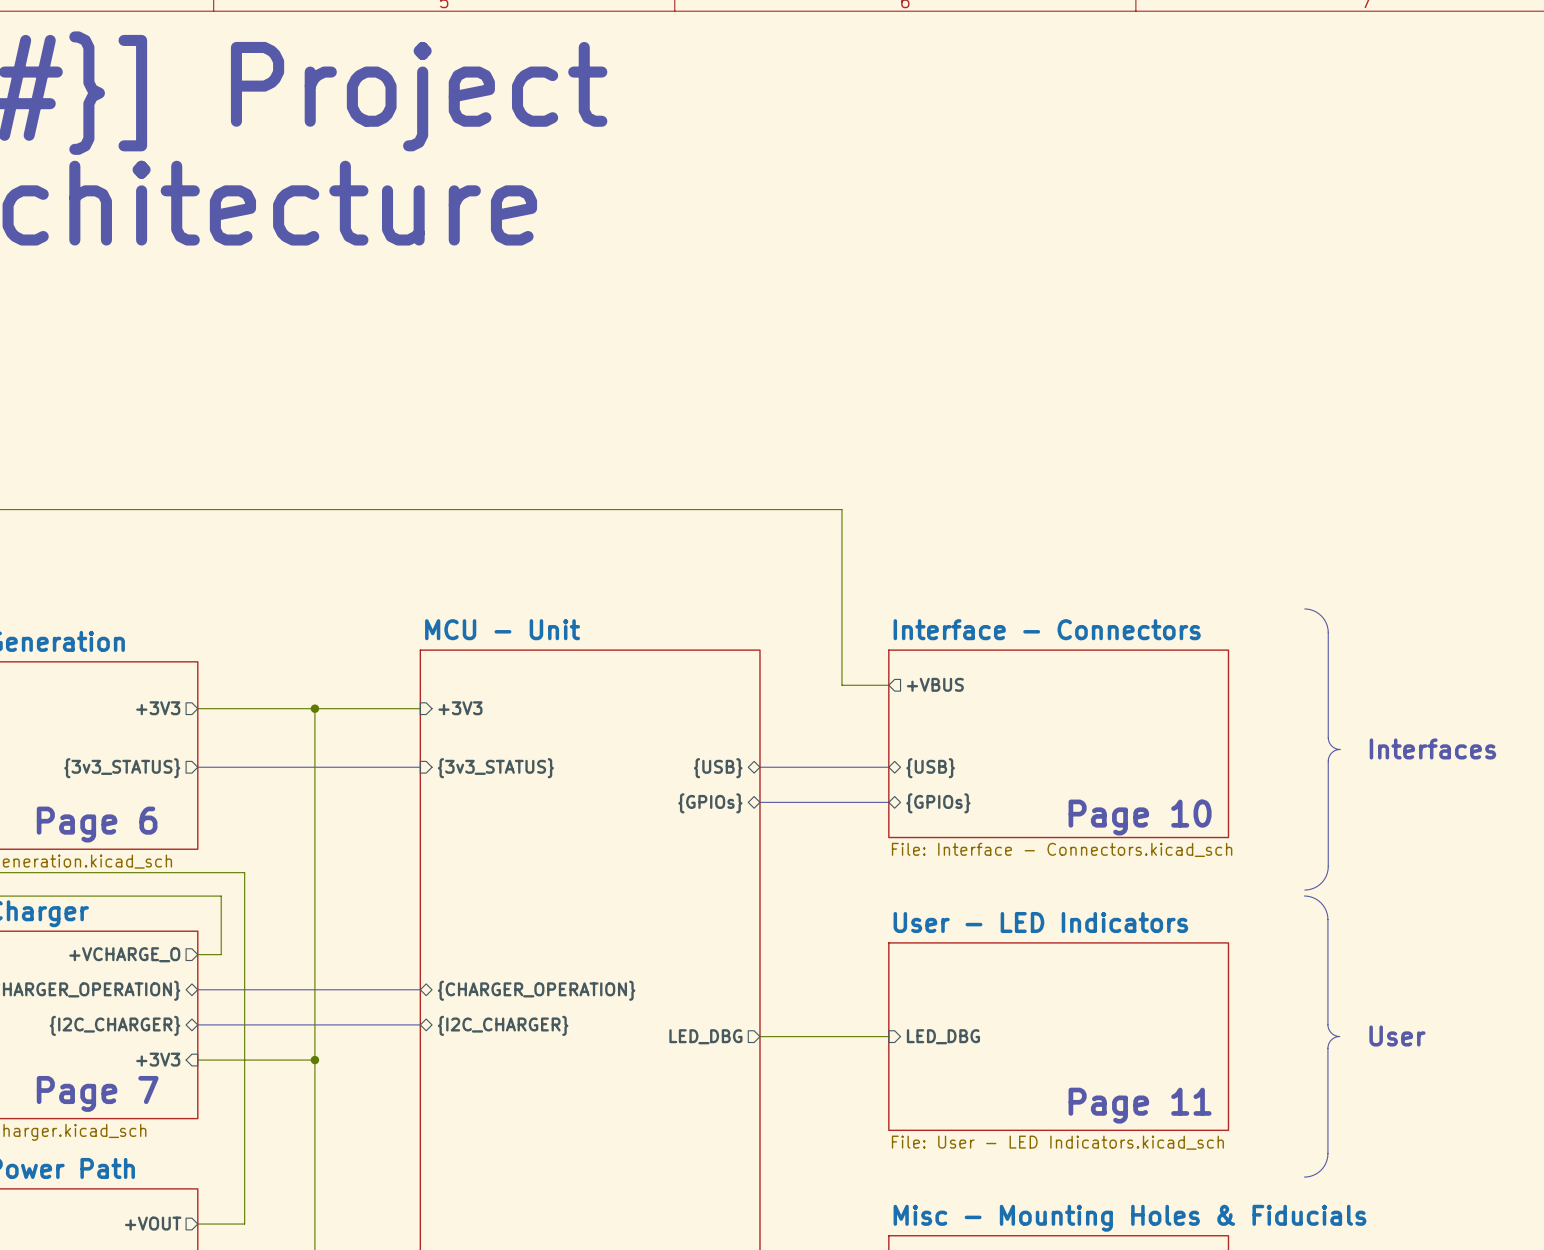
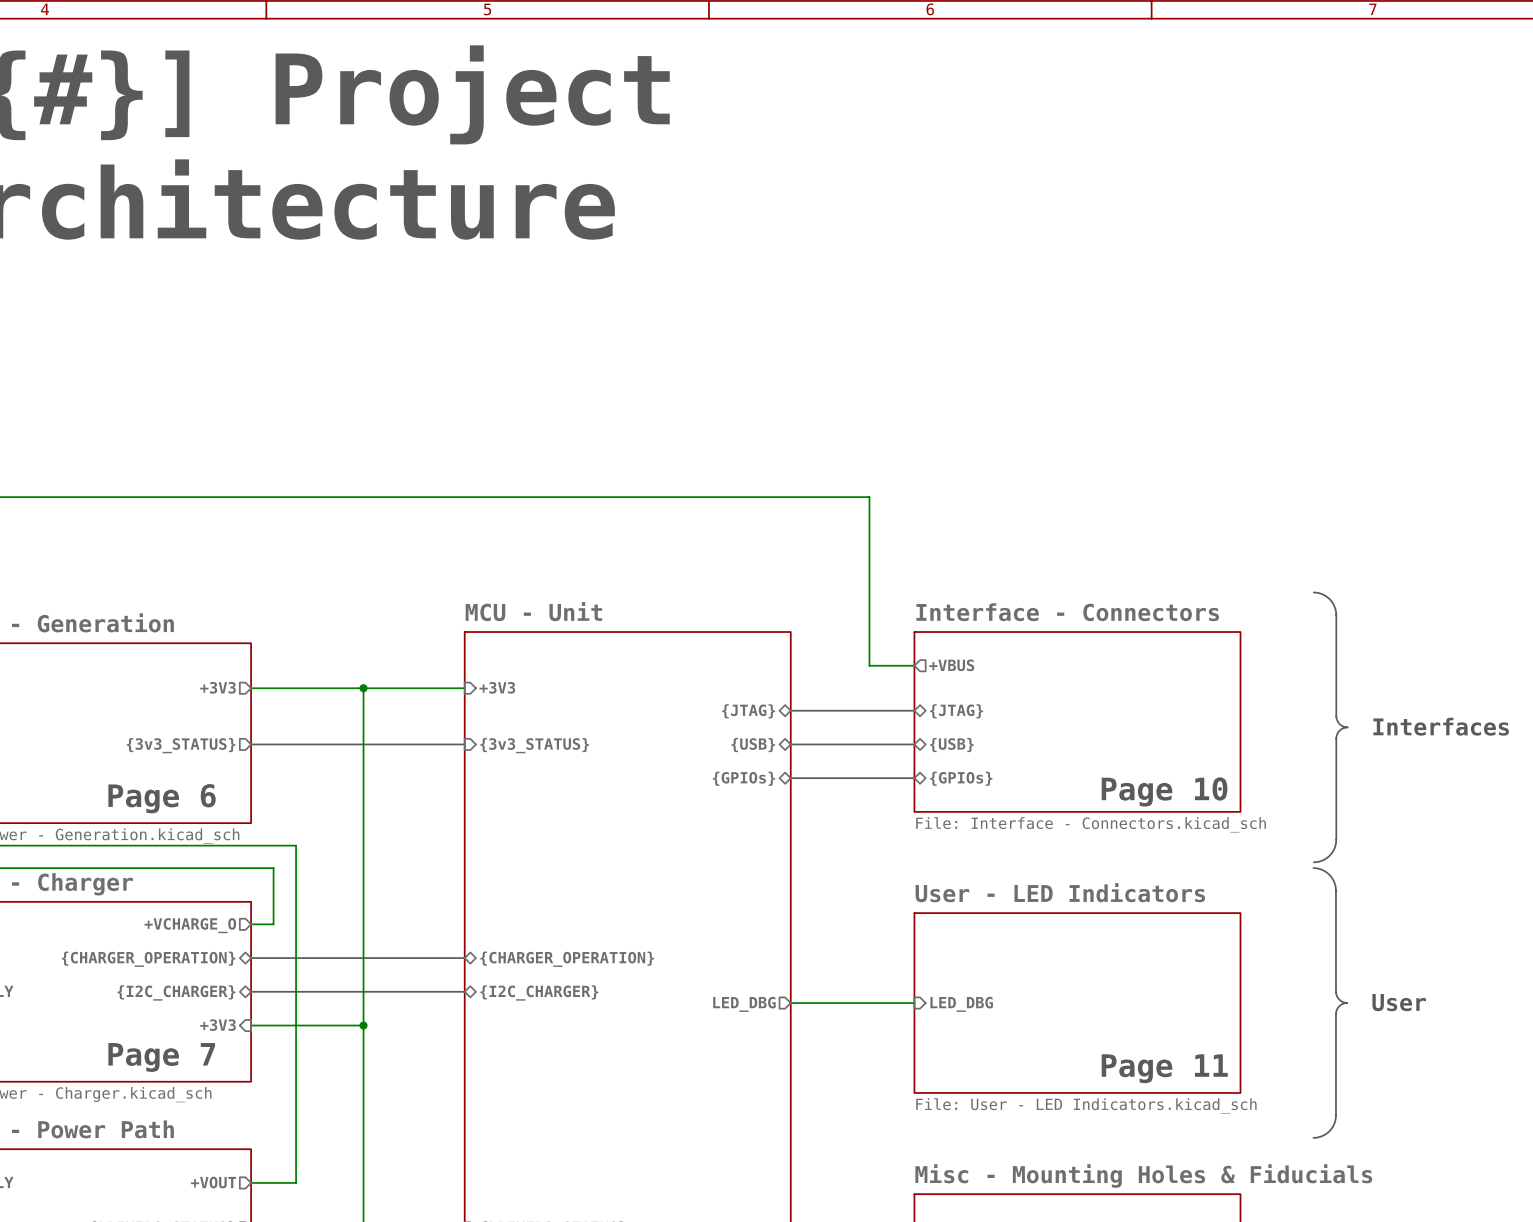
bus: none -> (790, 710) (914, 710)
sheet pin: none -> {JTAG} (748, 711)
sheet pin: none -> {JTAG} (956, 711)

